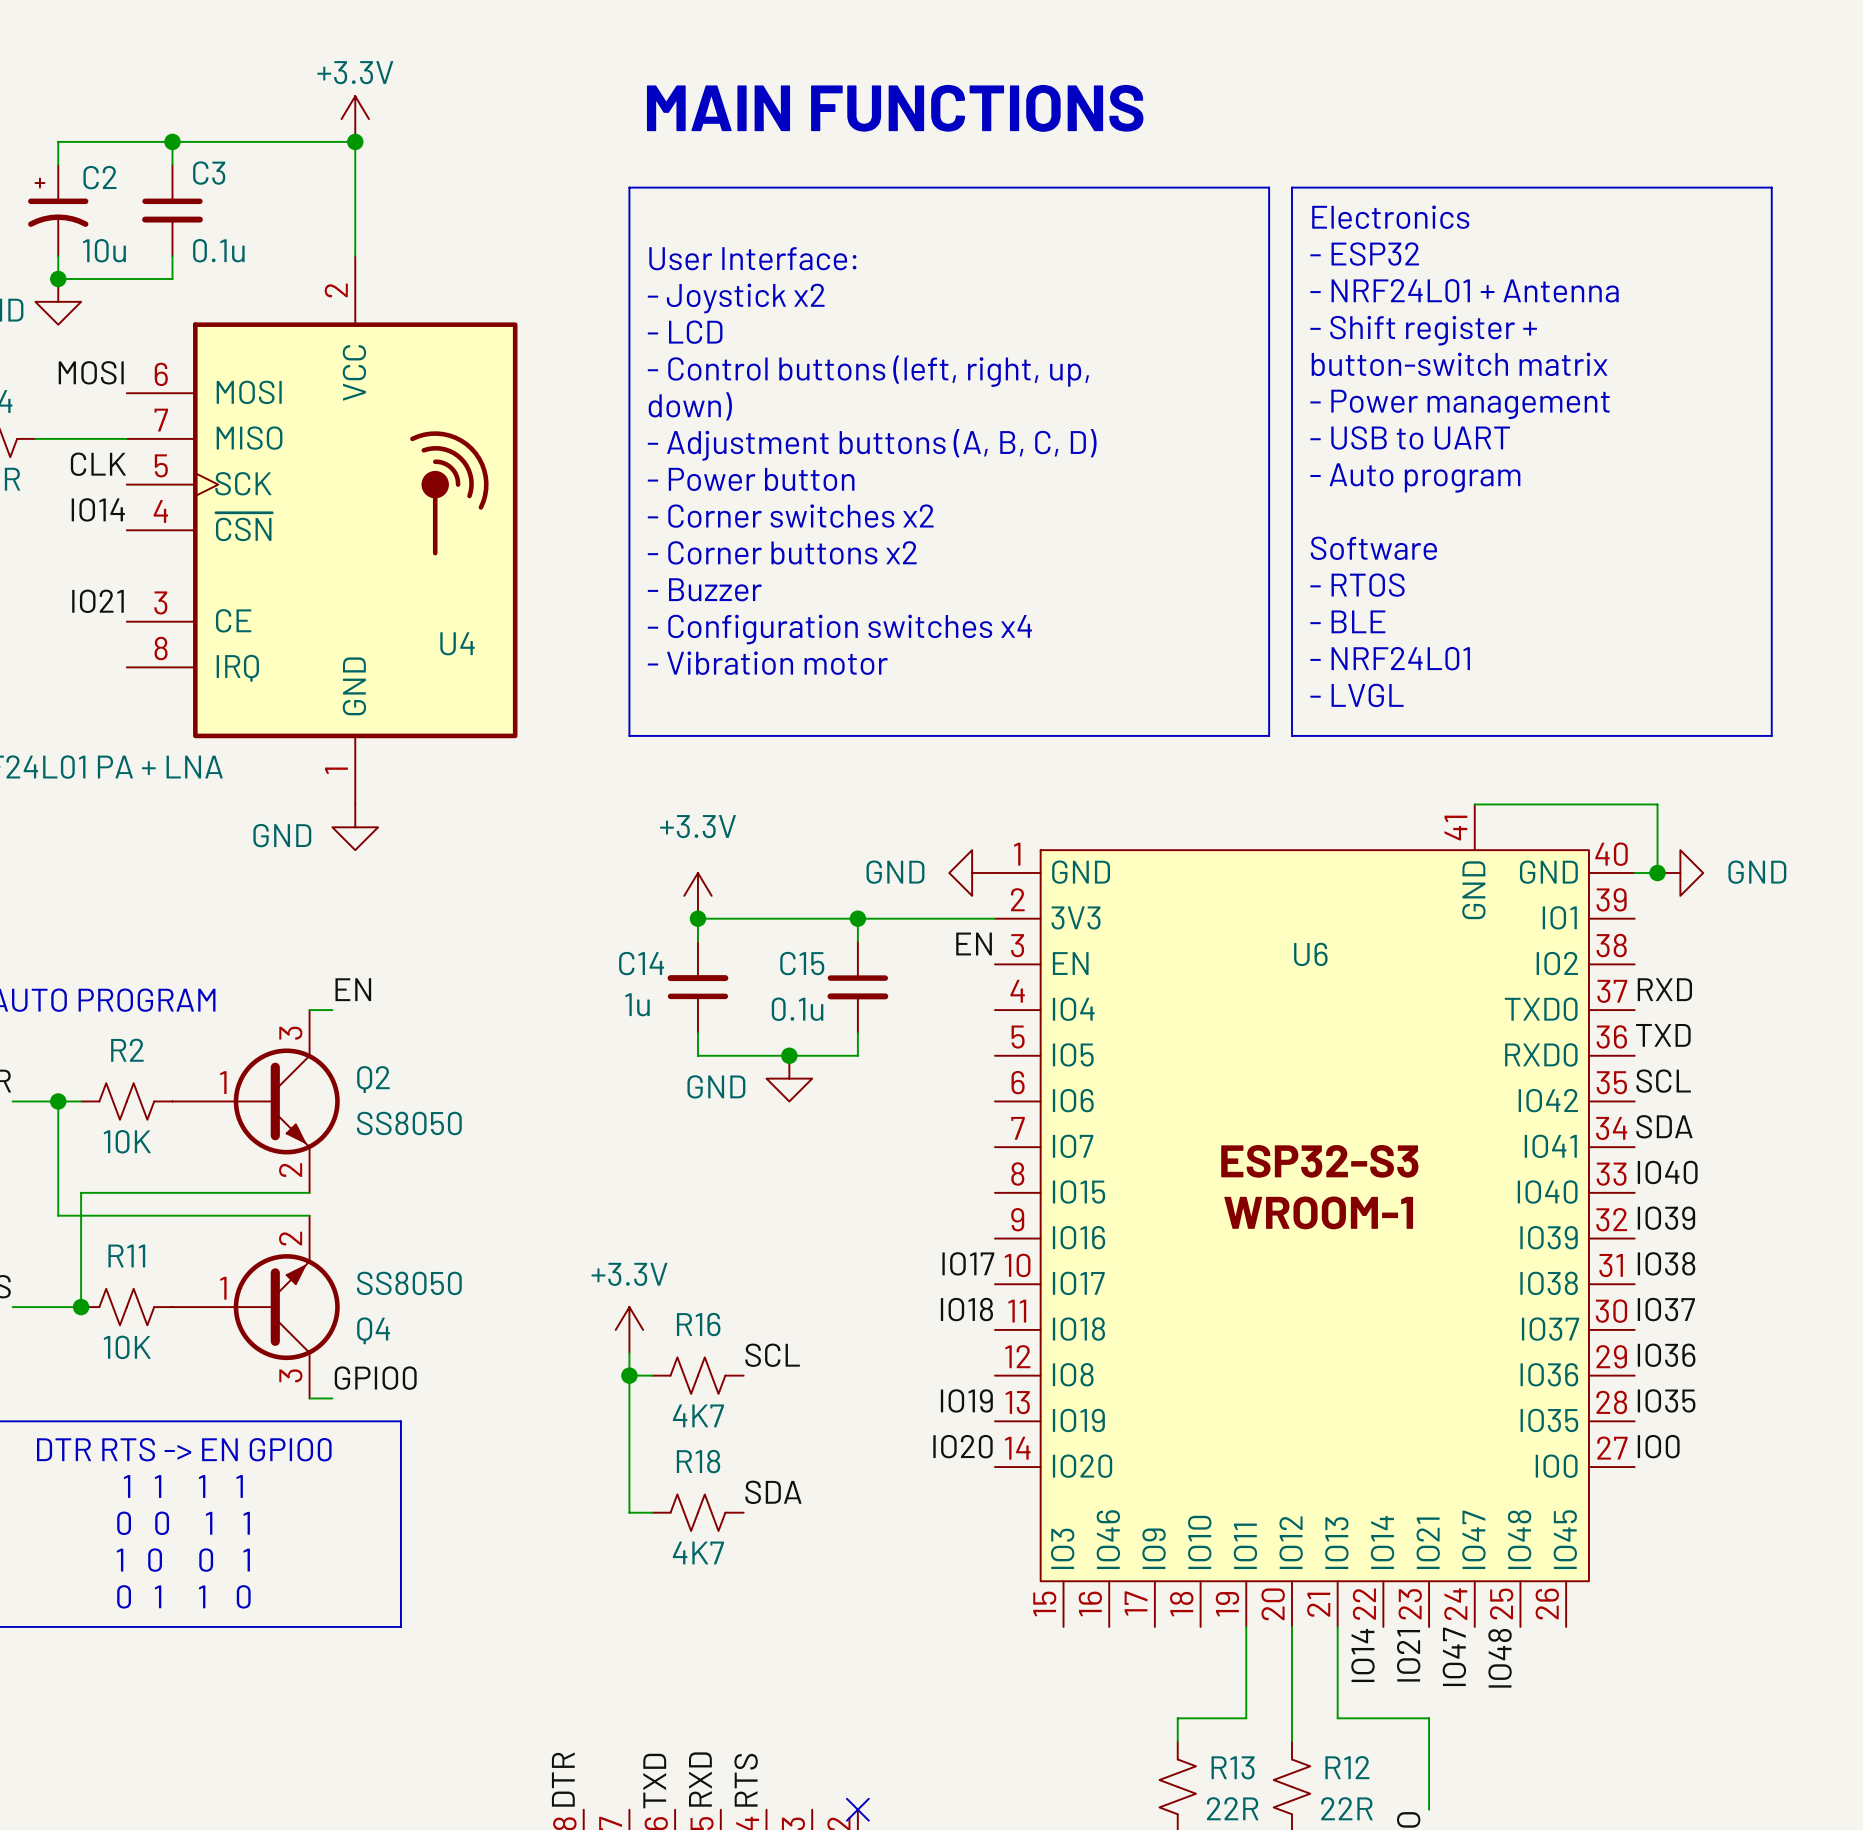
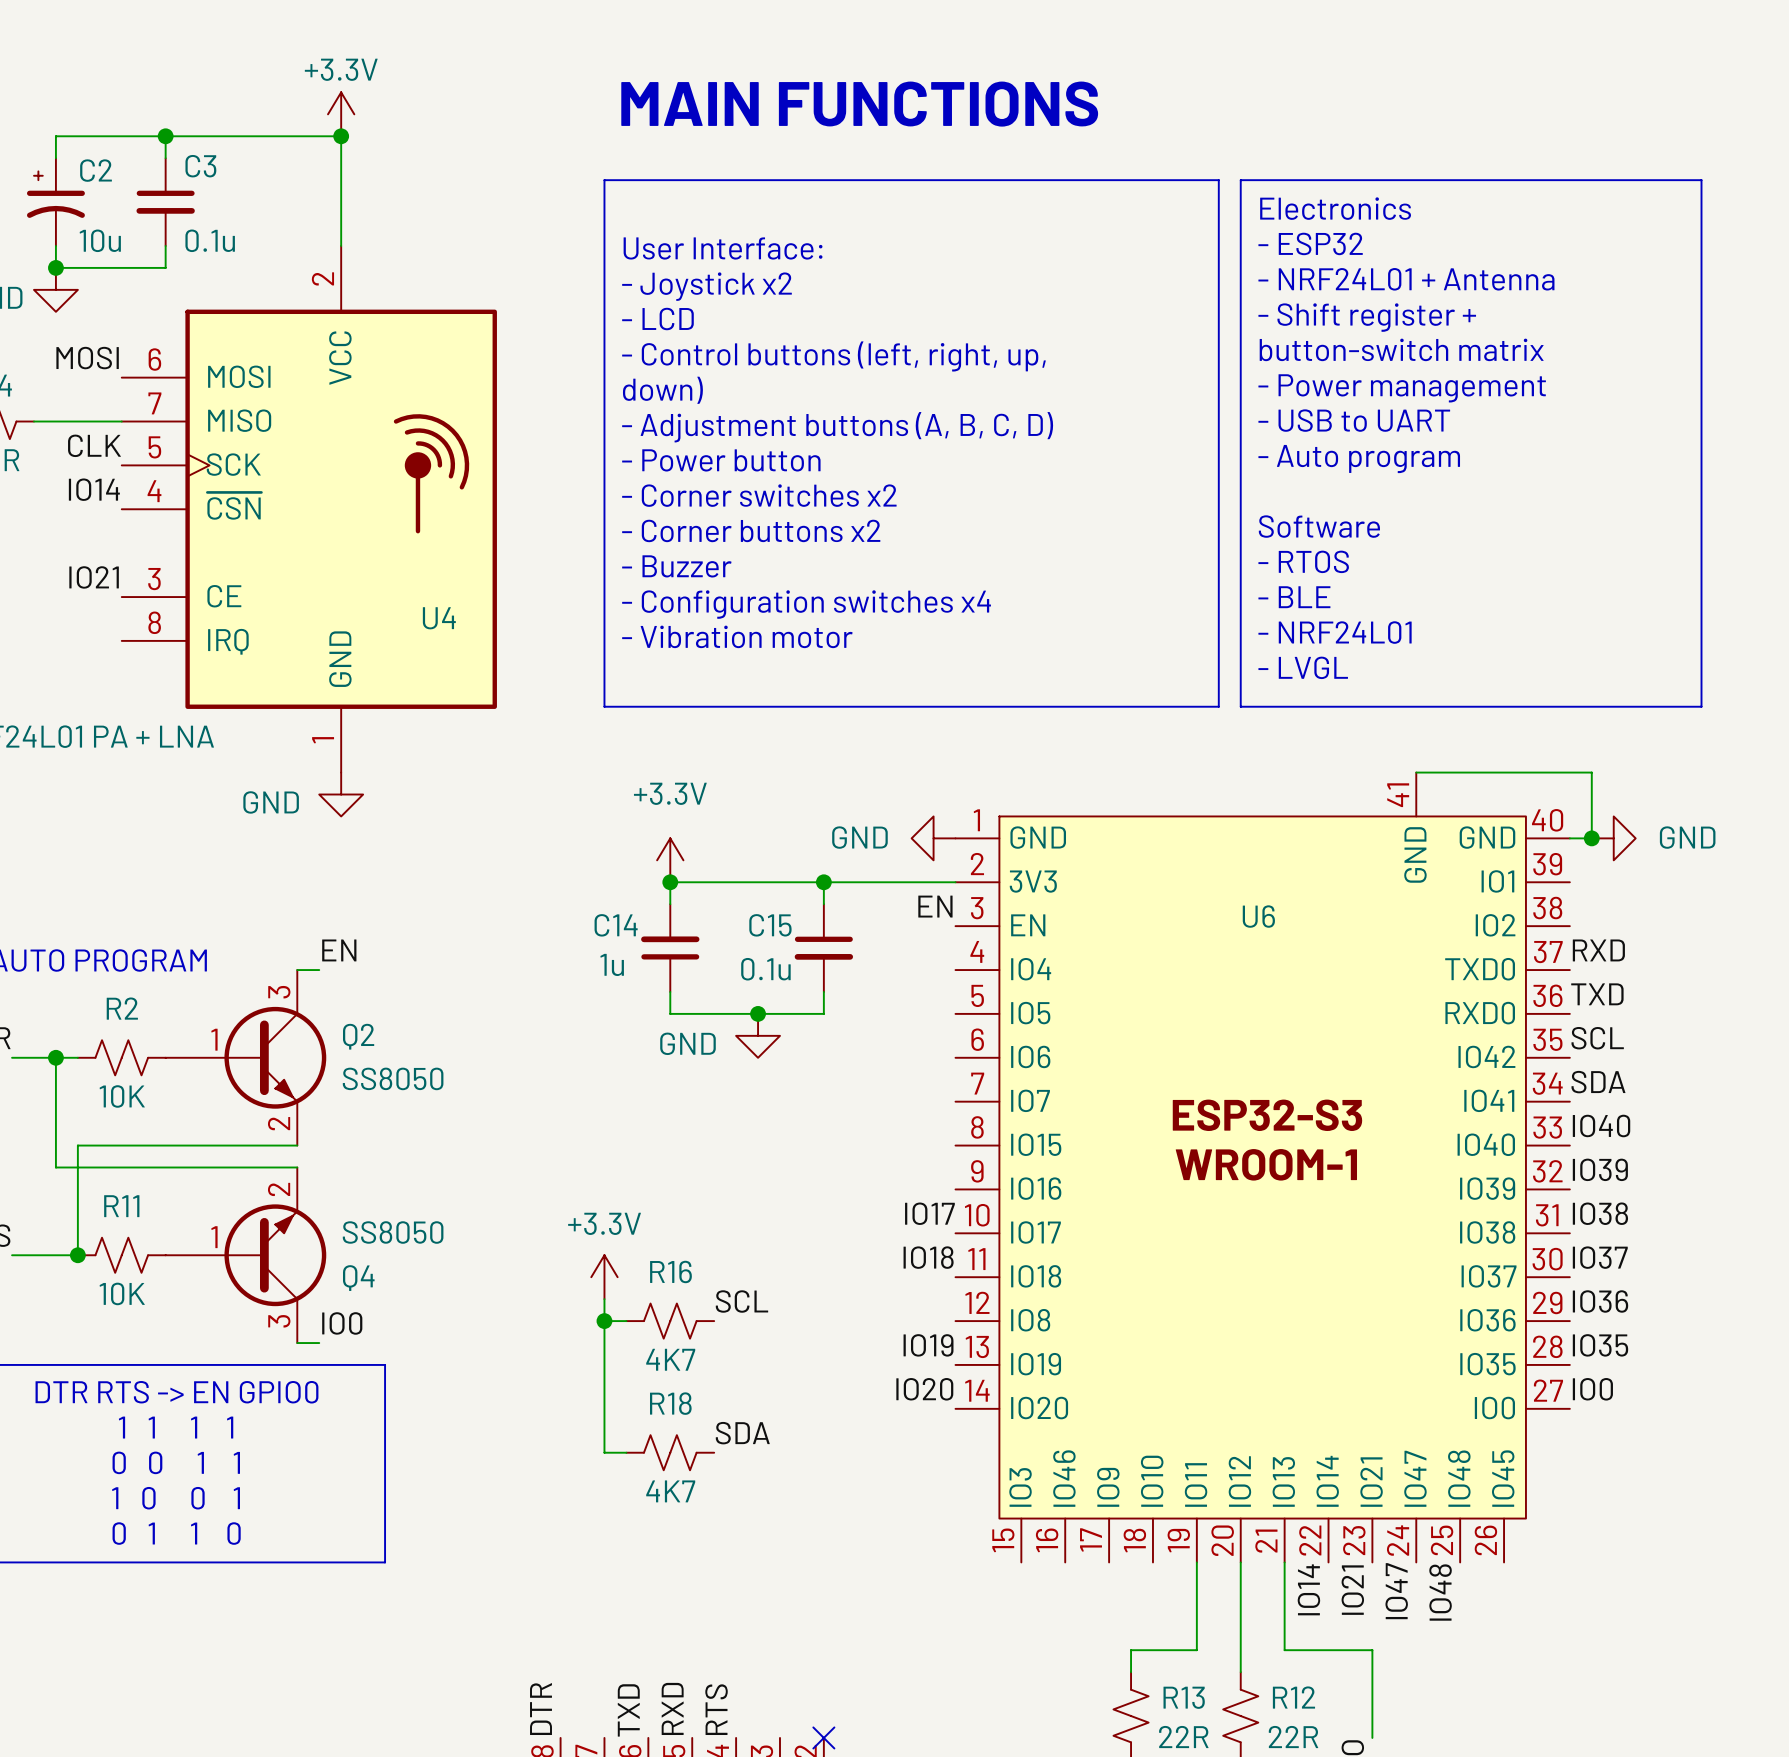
label: GPIO0 (375, 1378) -> IO0 (342, 1323)

